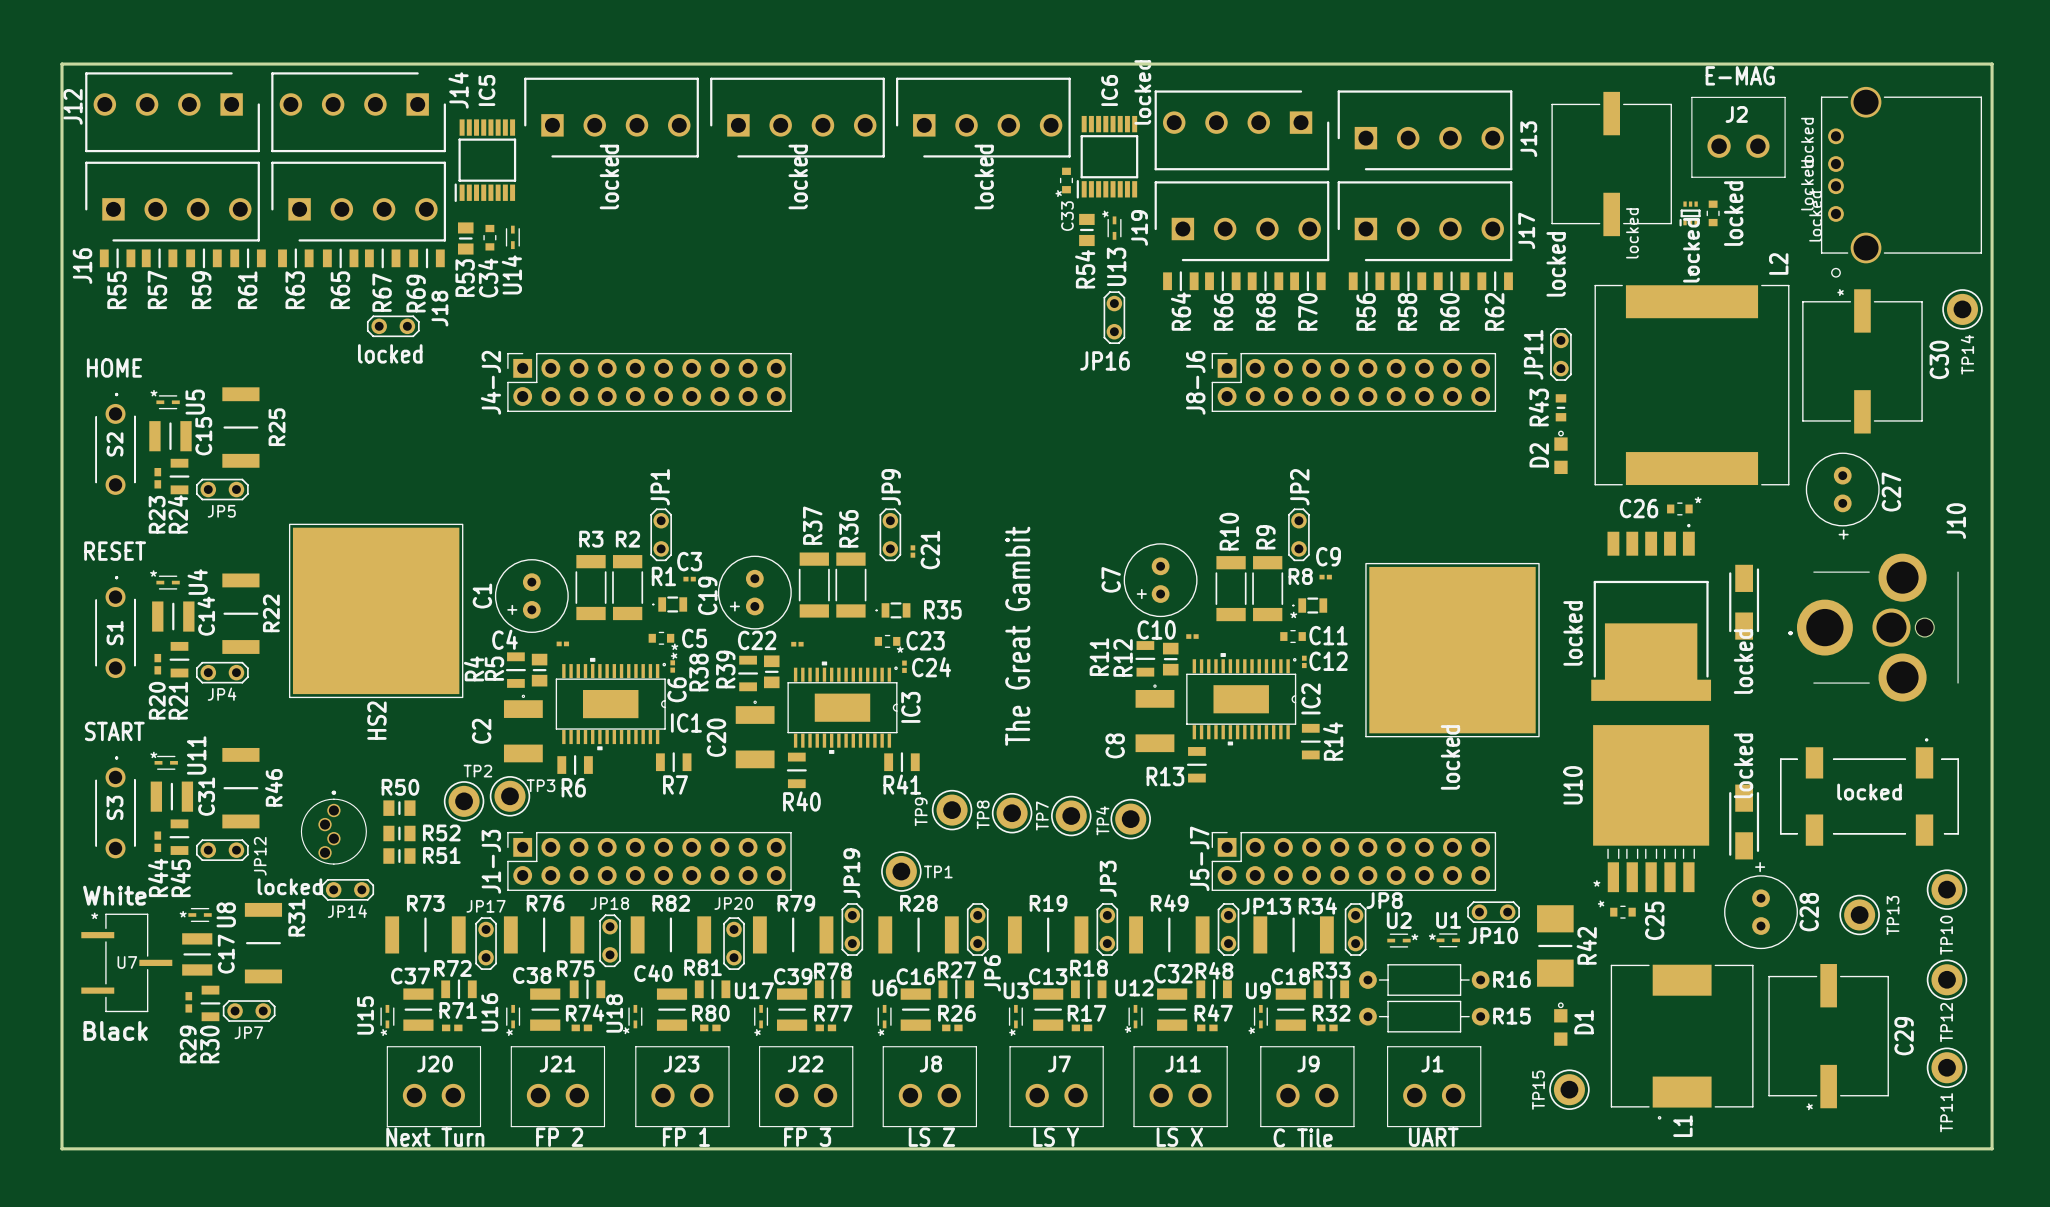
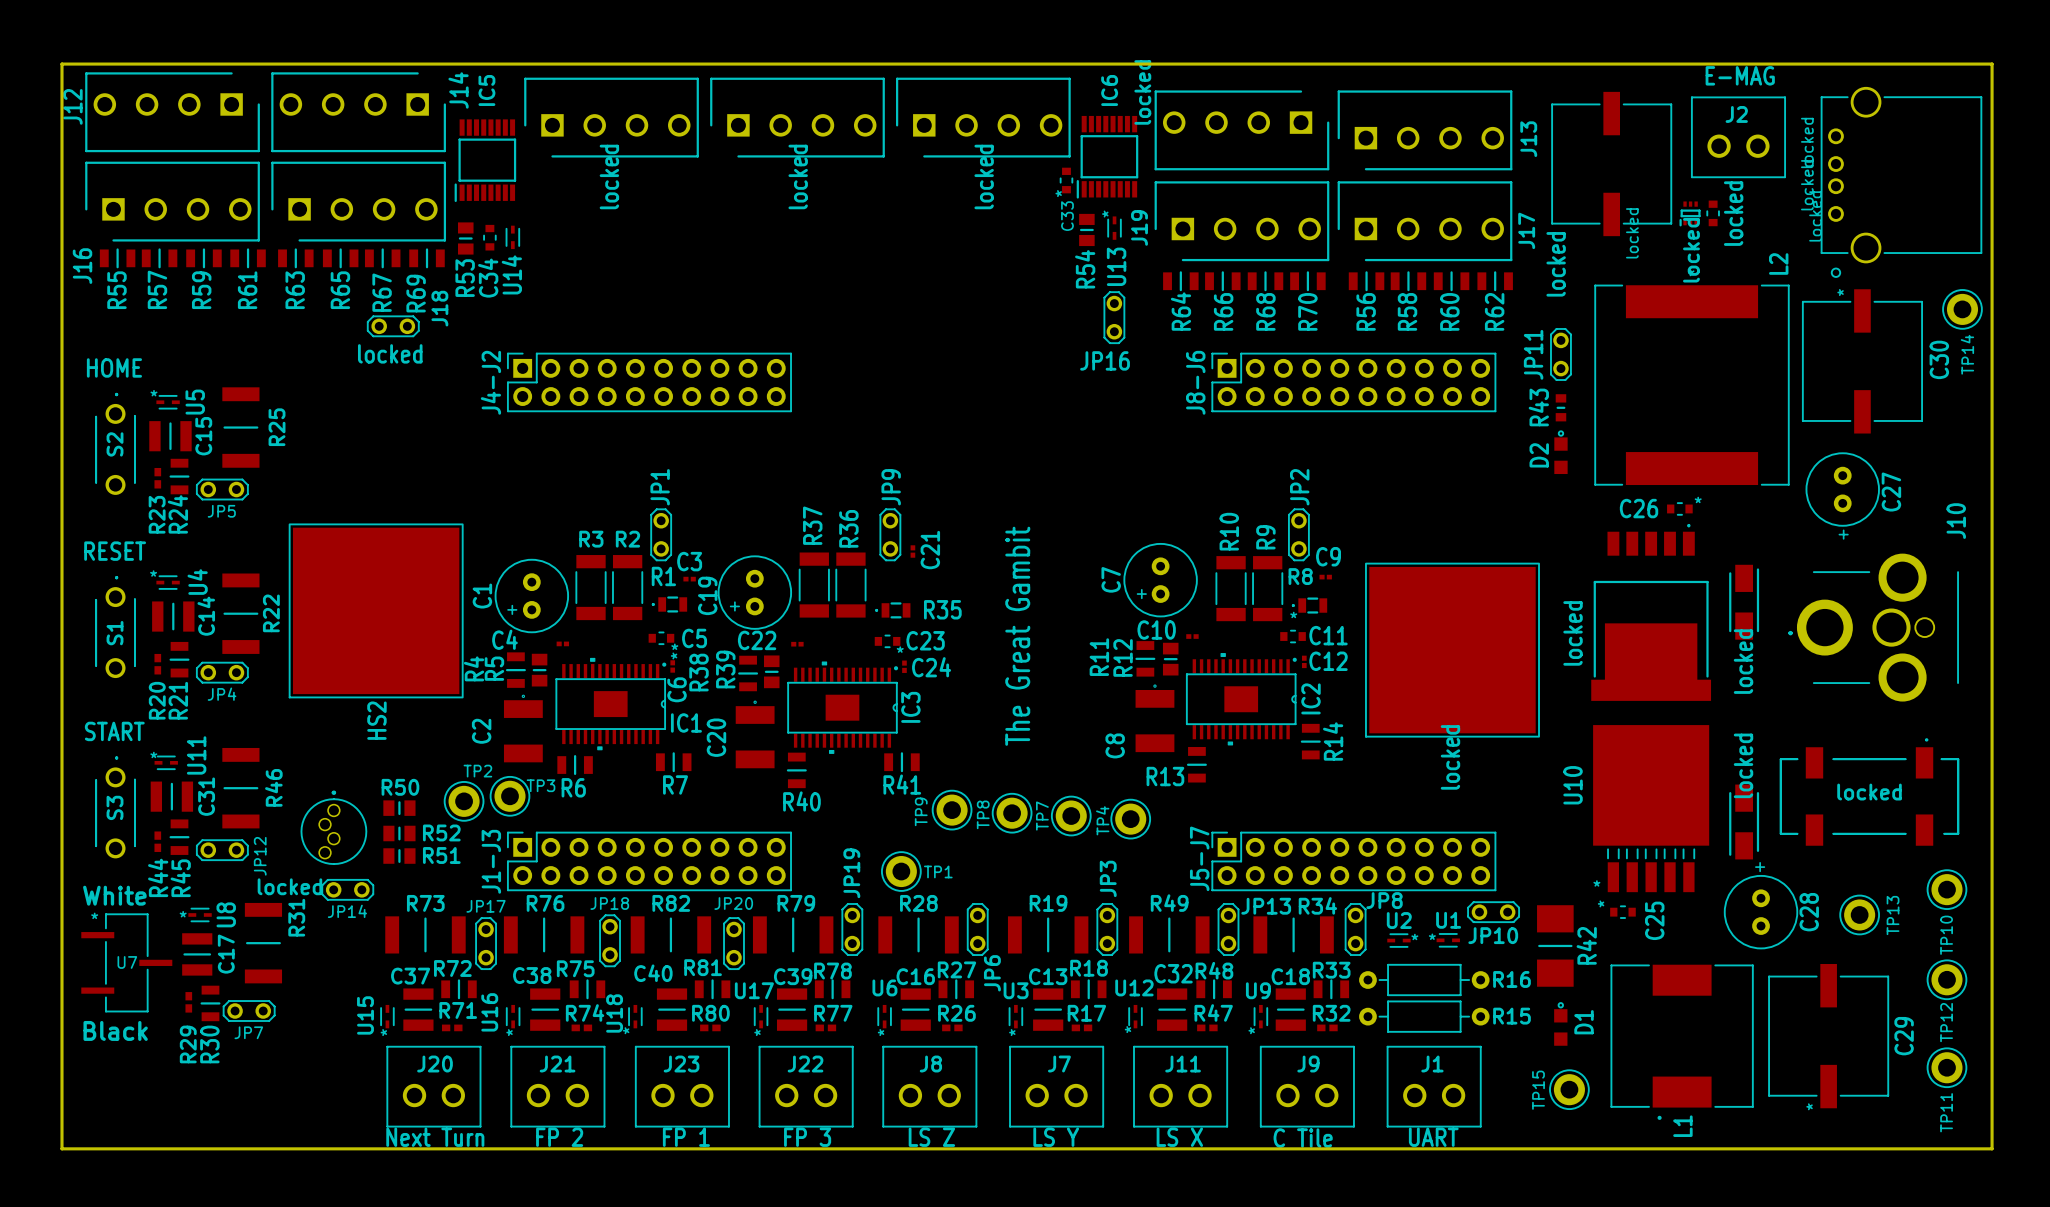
IC2 footprint: [1186, 653, 1297, 746] -> [1186, 653, 1297, 746]
IC1 footprint: [555, 657, 667, 751] -> [555, 657, 667, 751]
IC3 footprint: [787, 661, 898, 754] -> [787, 661, 898, 754]

